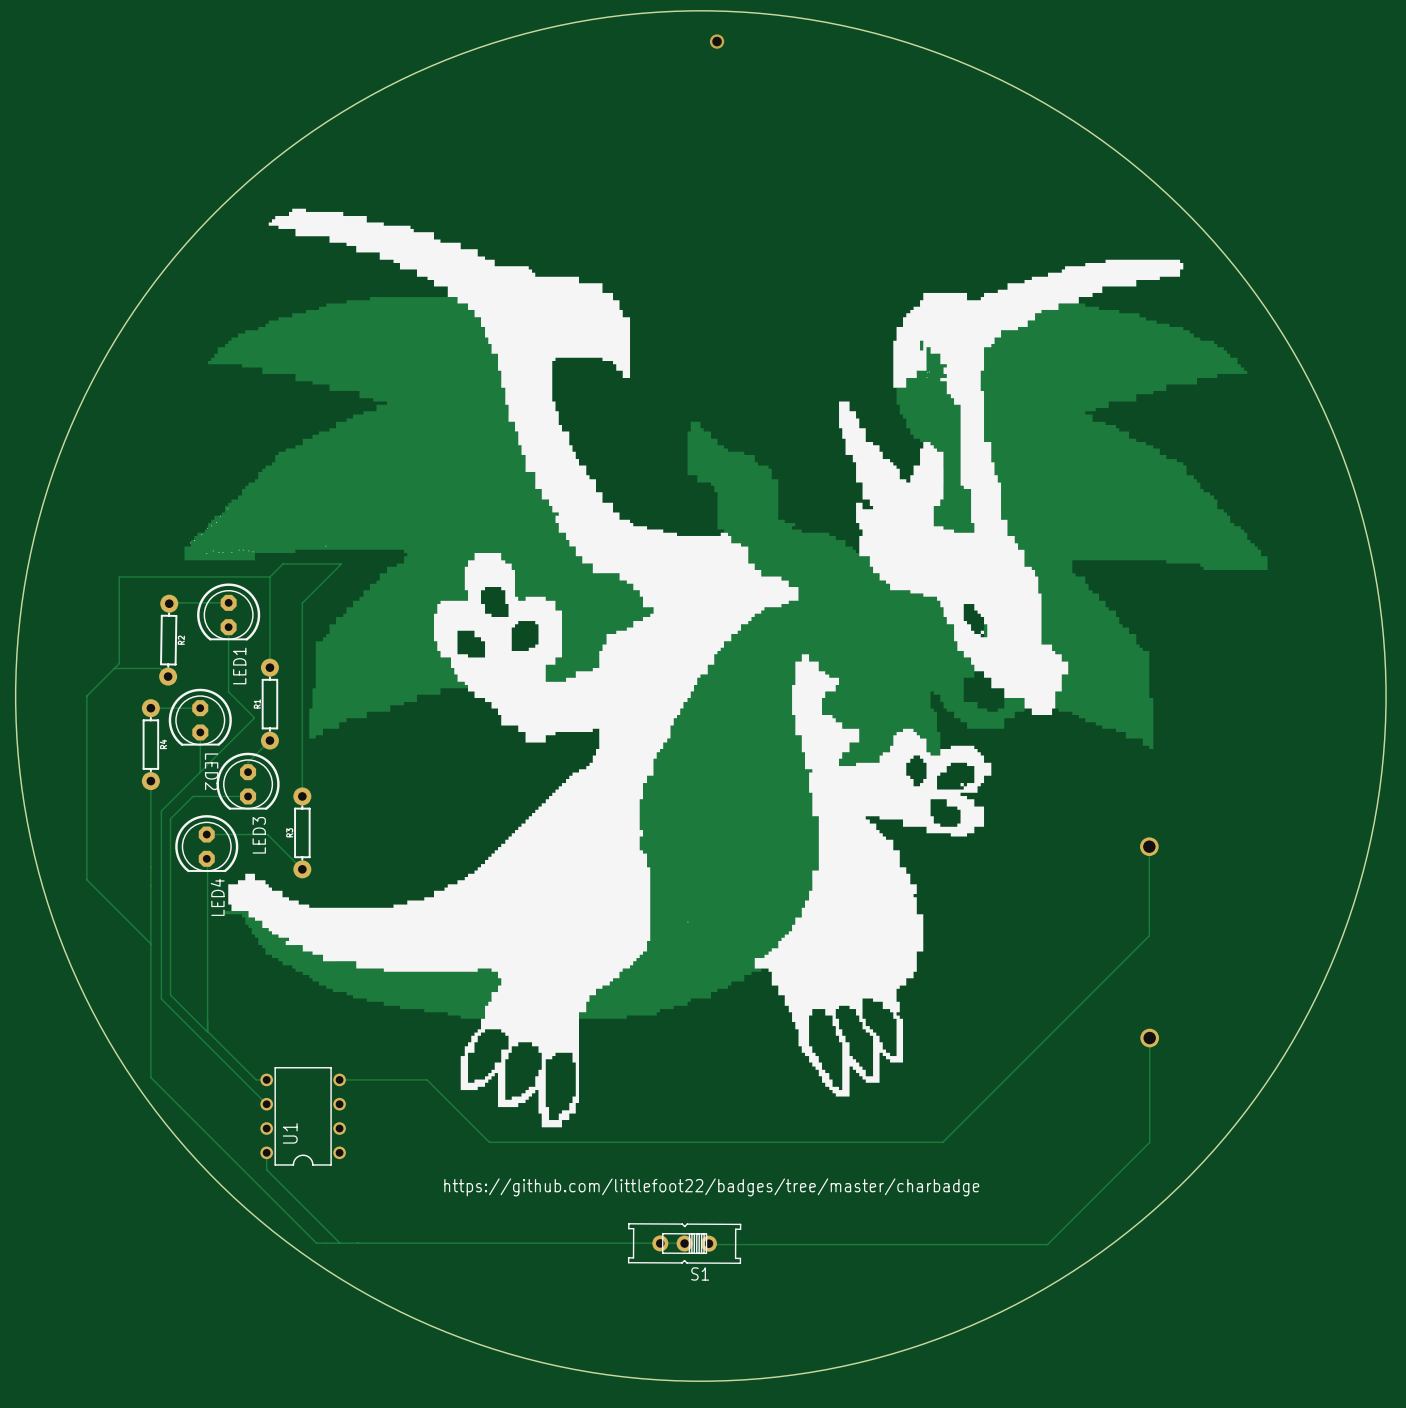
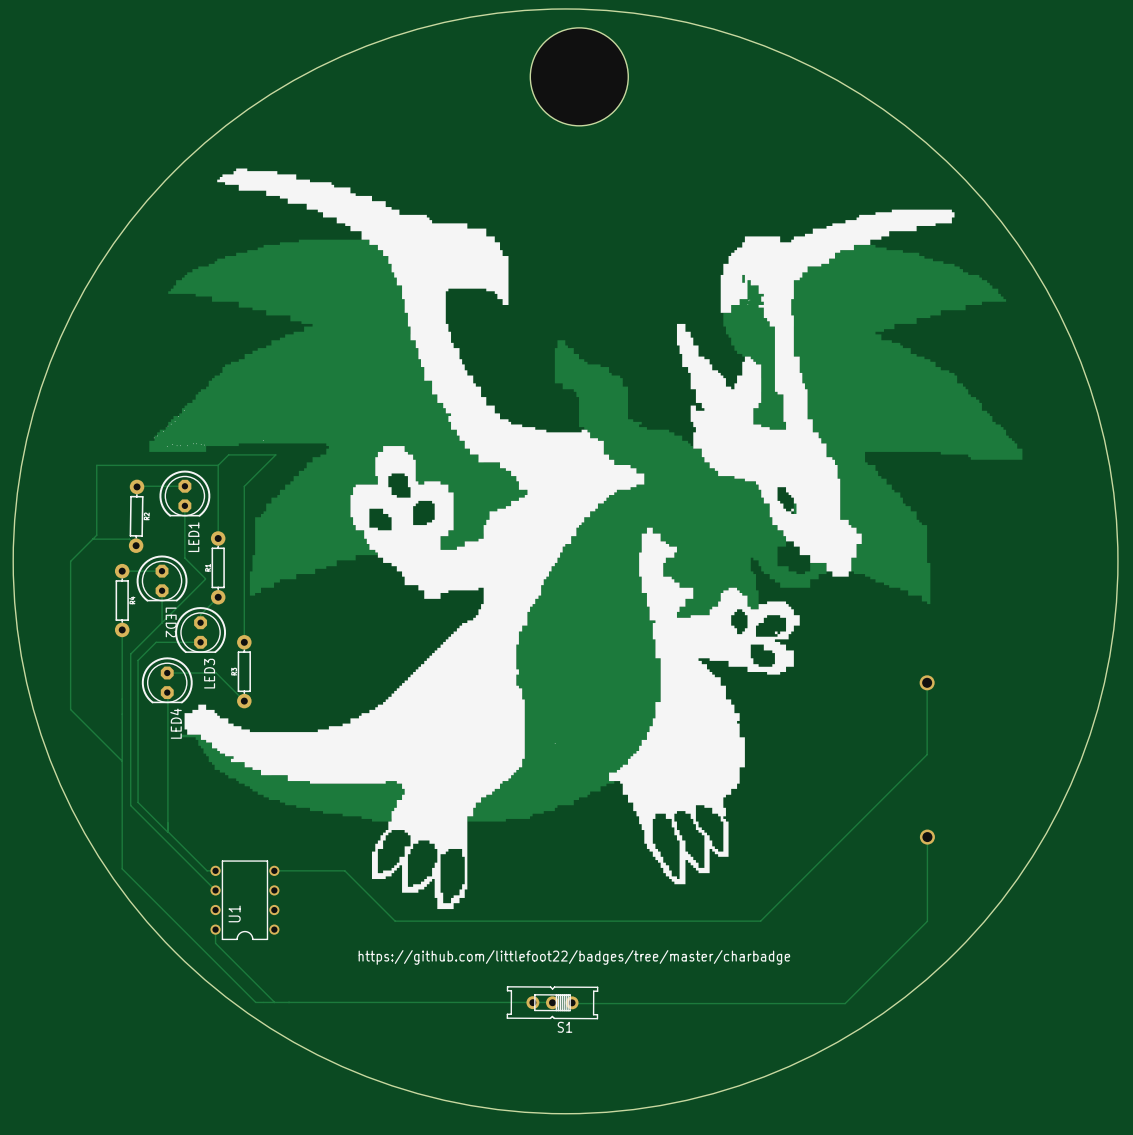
via: (717, 41) -> none
hole: none -> (579, 76)

